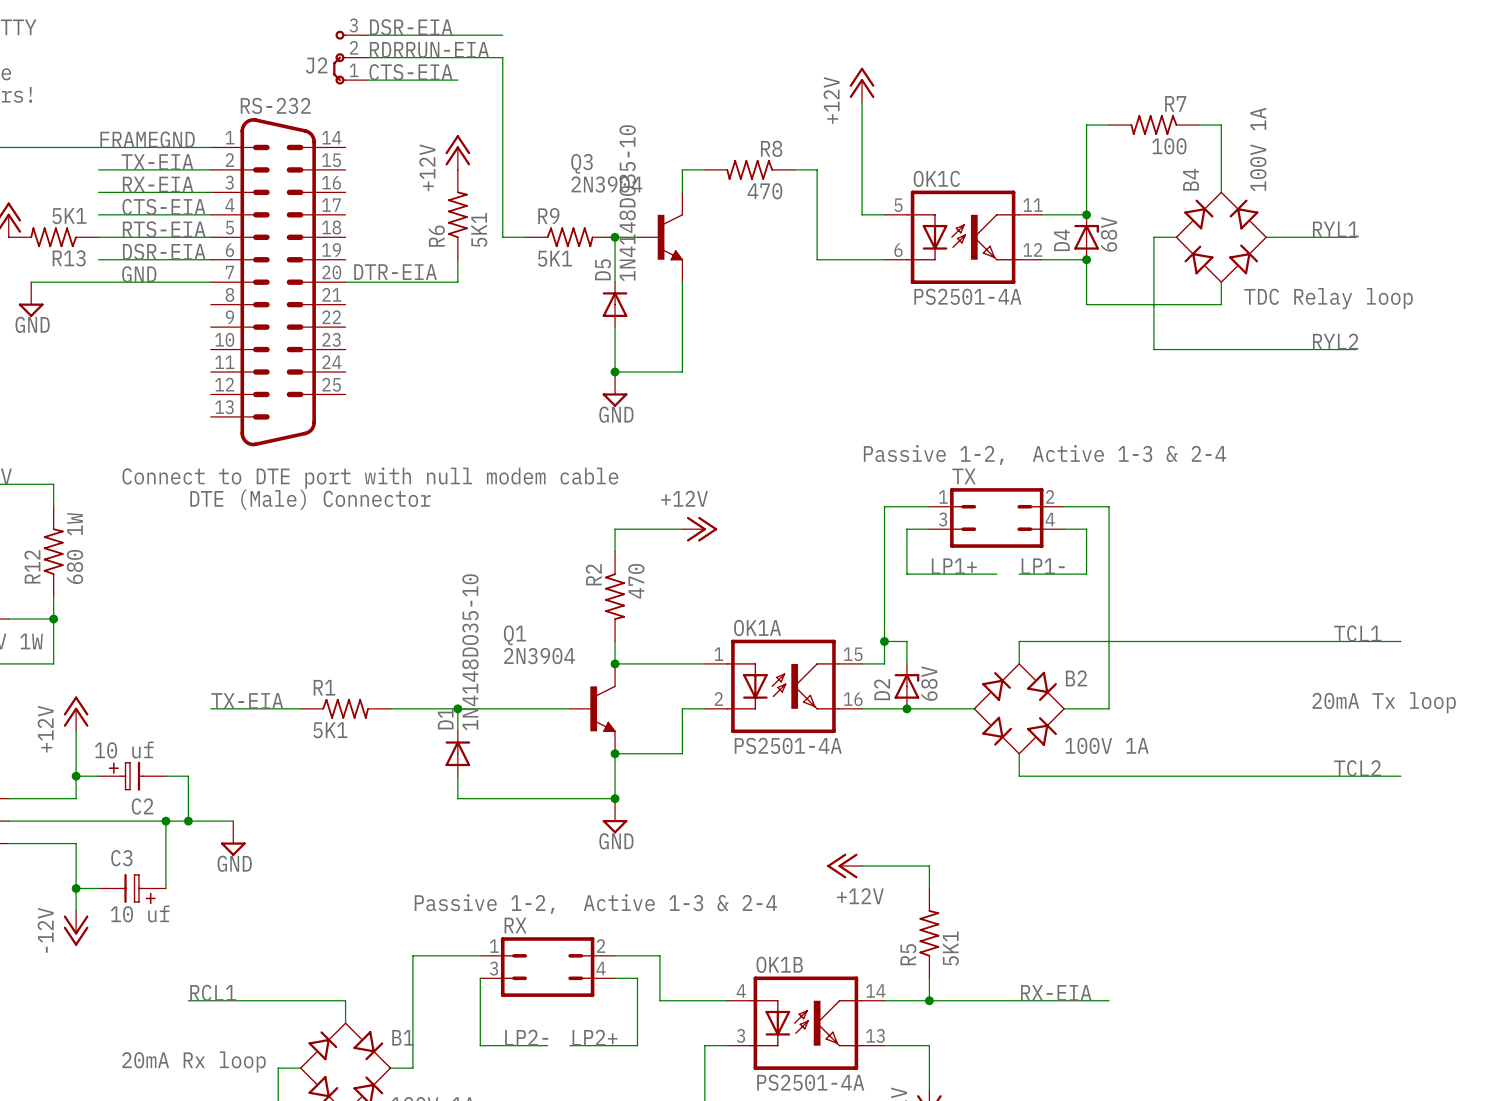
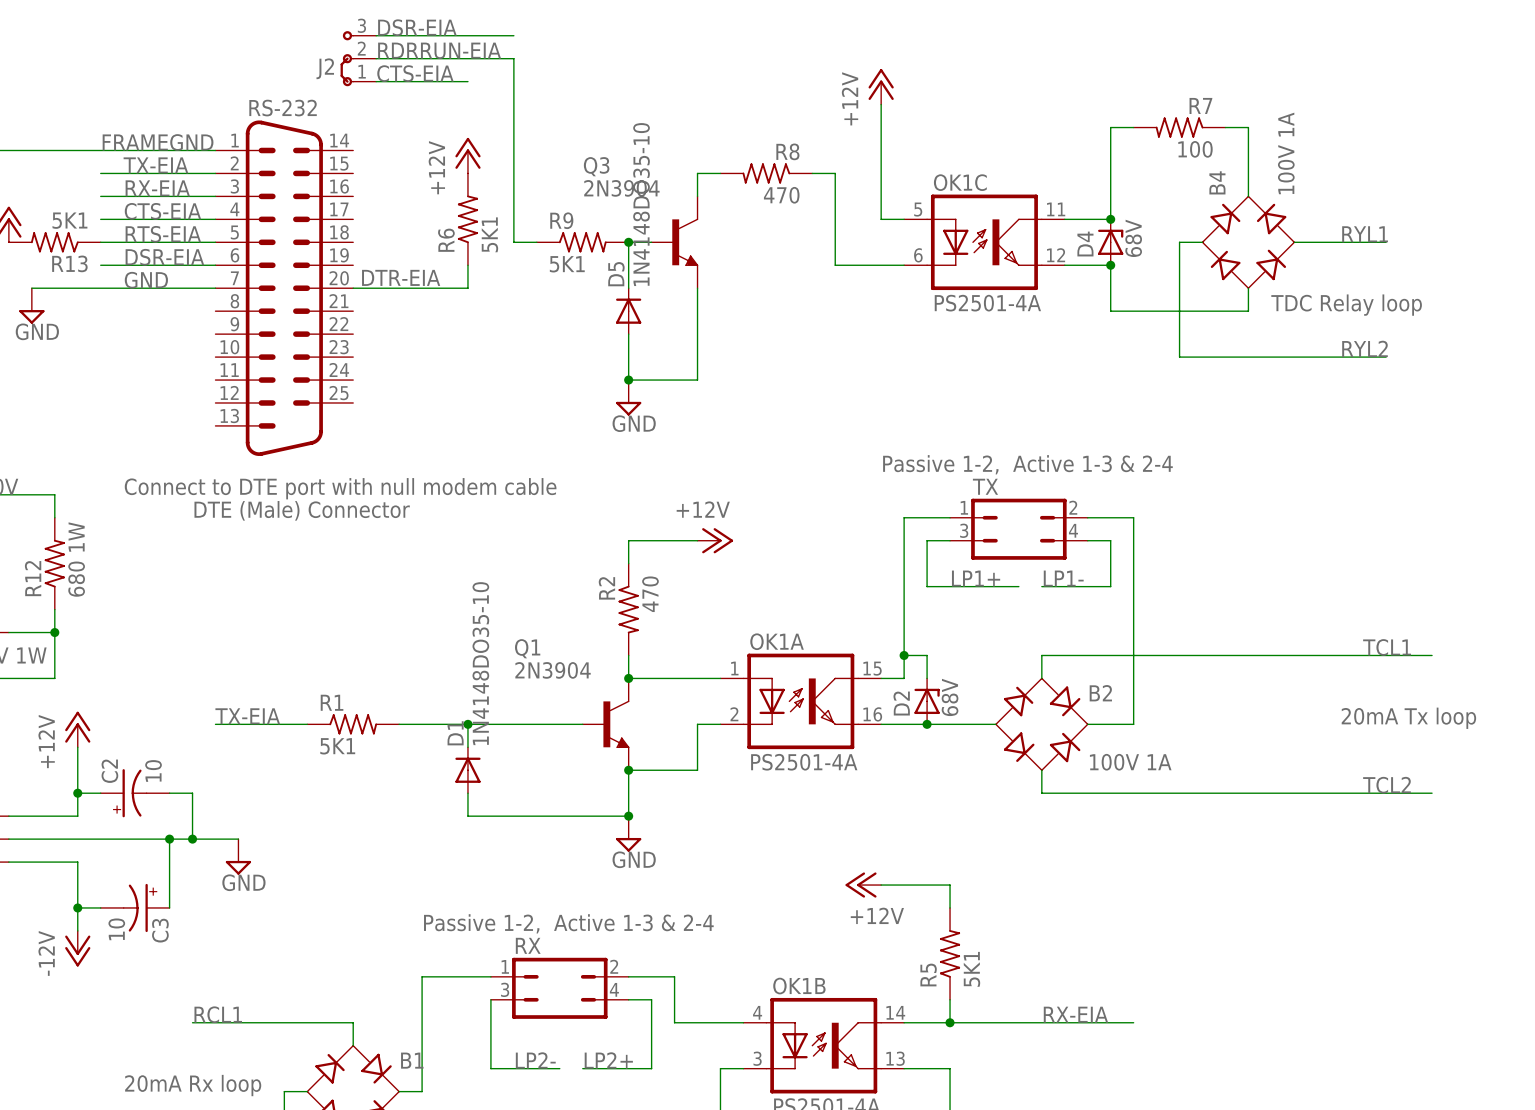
C2 value: 10 uf (124, 750) -> 10 (153, 770)
C2 symbol: [98, 761, 166, 791] -> [100, 769, 170, 818]
C2 name position: C2 (142, 806) -> C2 (109, 771)
C3 name position: C3 (121, 858) -> C3 (160, 930)
C3 symbol: [98, 873, 166, 904] -> [100, 883, 170, 933]
C3 value: 10 uf (140, 913) -> 10 (116, 929)

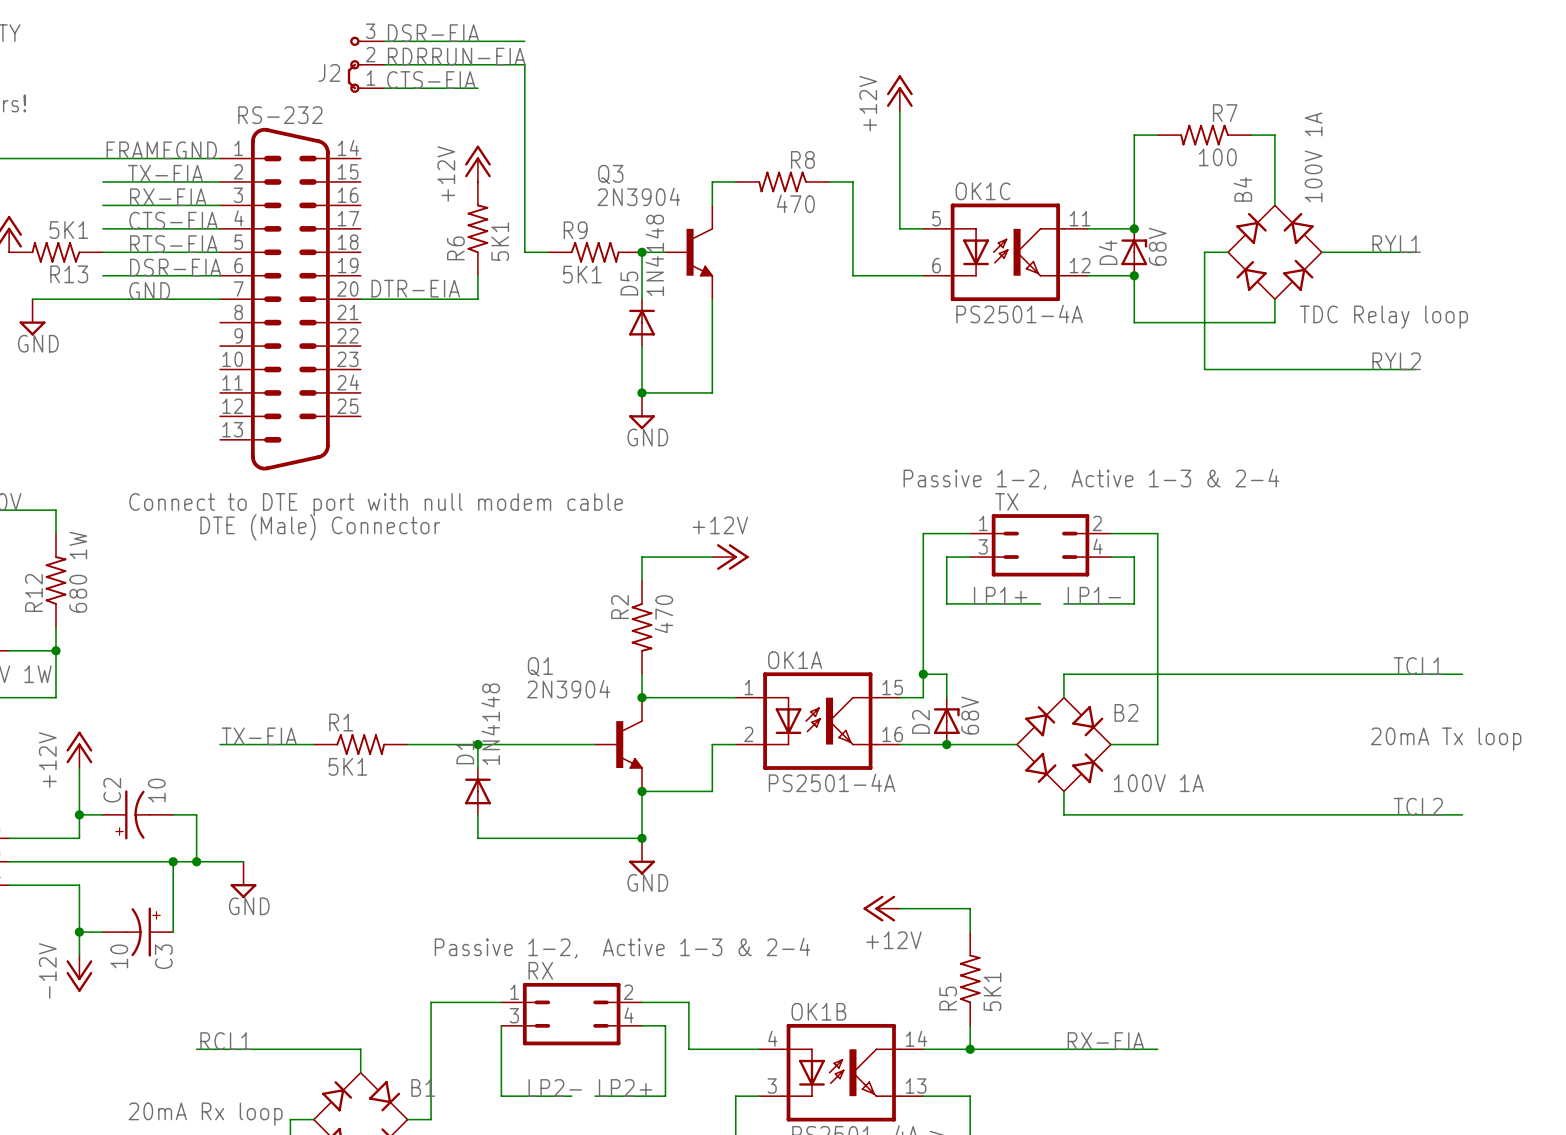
D5 value: 1N4148DO35-10 (641, 204) -> 1N4148 (654, 255)
D1 value: 1N4148DO35-10 (480, 663) -> 1N4148 (490, 724)

